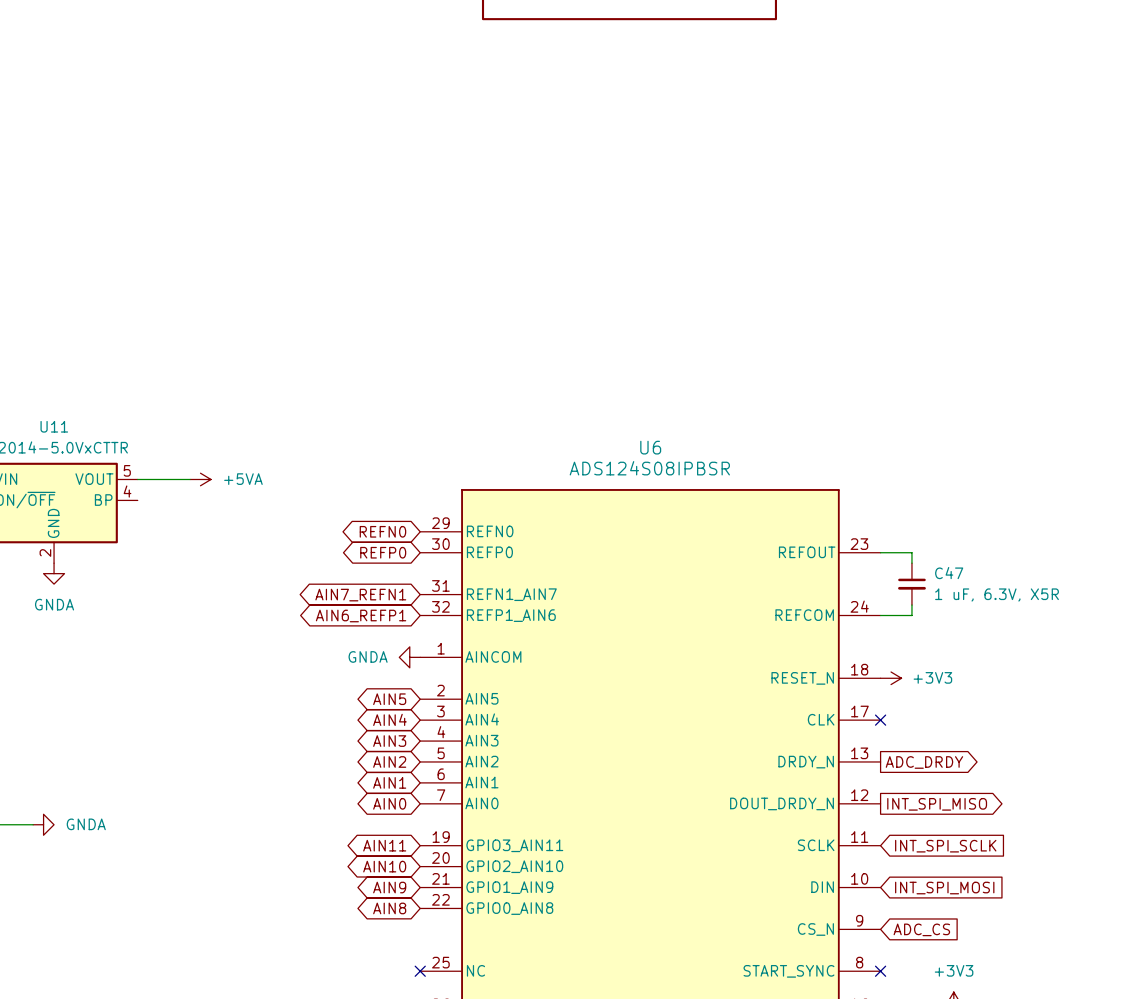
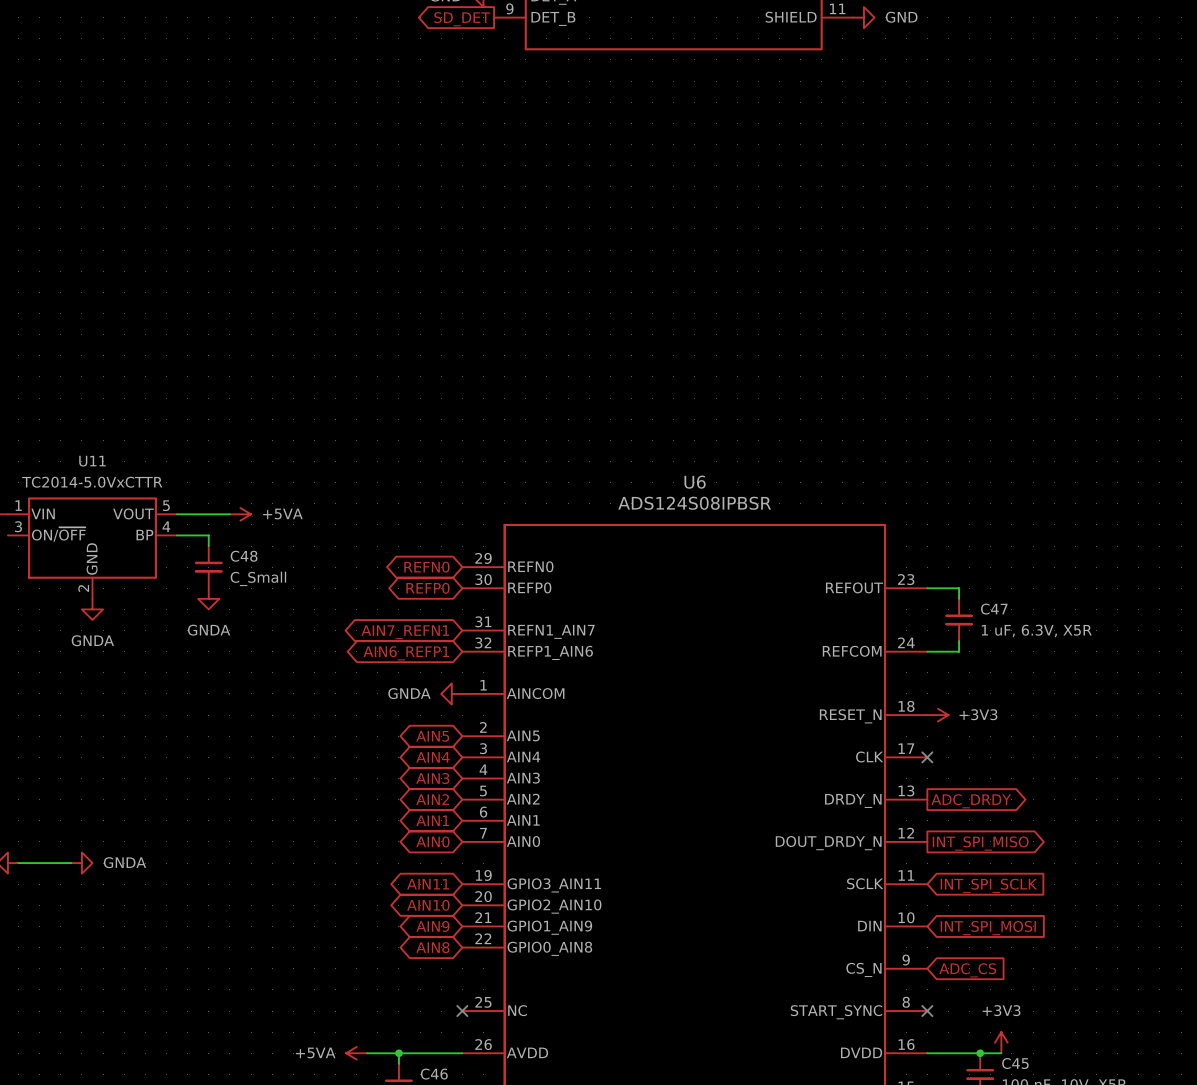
wire: none -> (177, 535) (208, 535) (208, 546)
C48: none -> C_Small (208, 567)
power symbol: none -> GNDA (208, 598)

